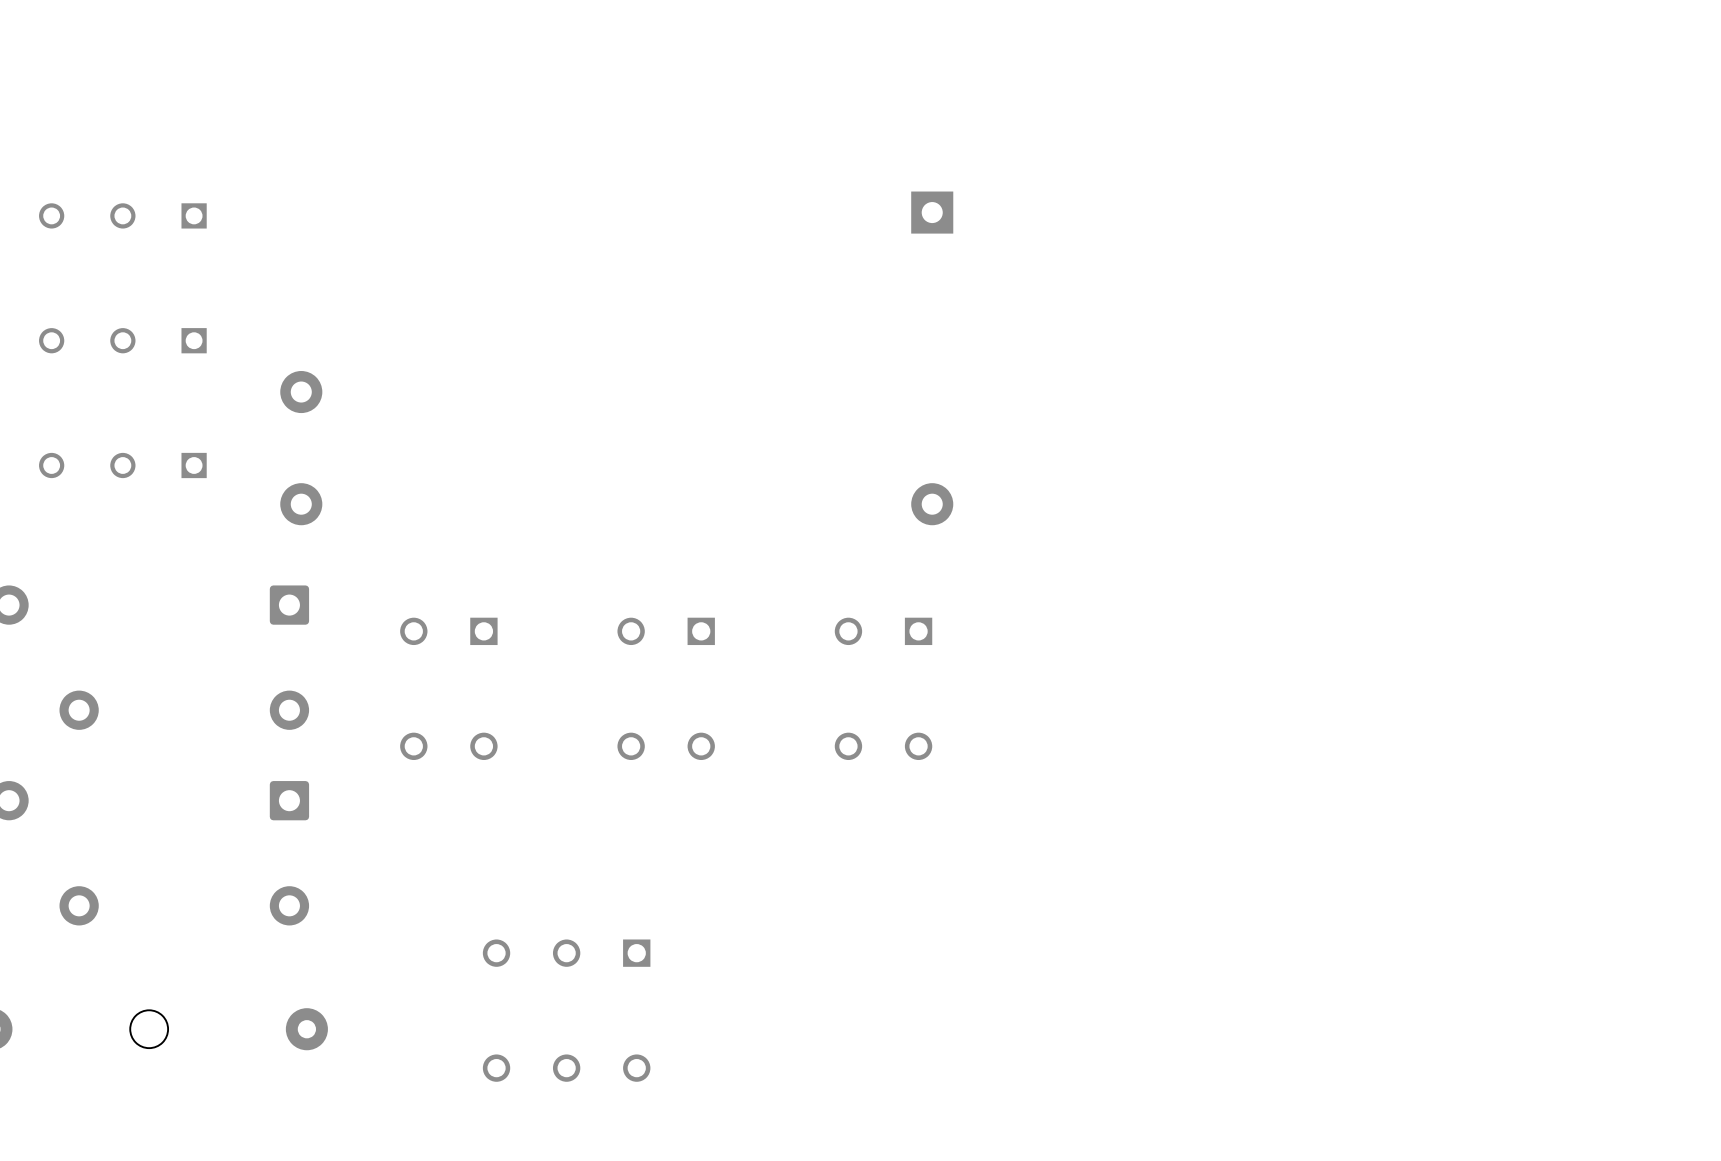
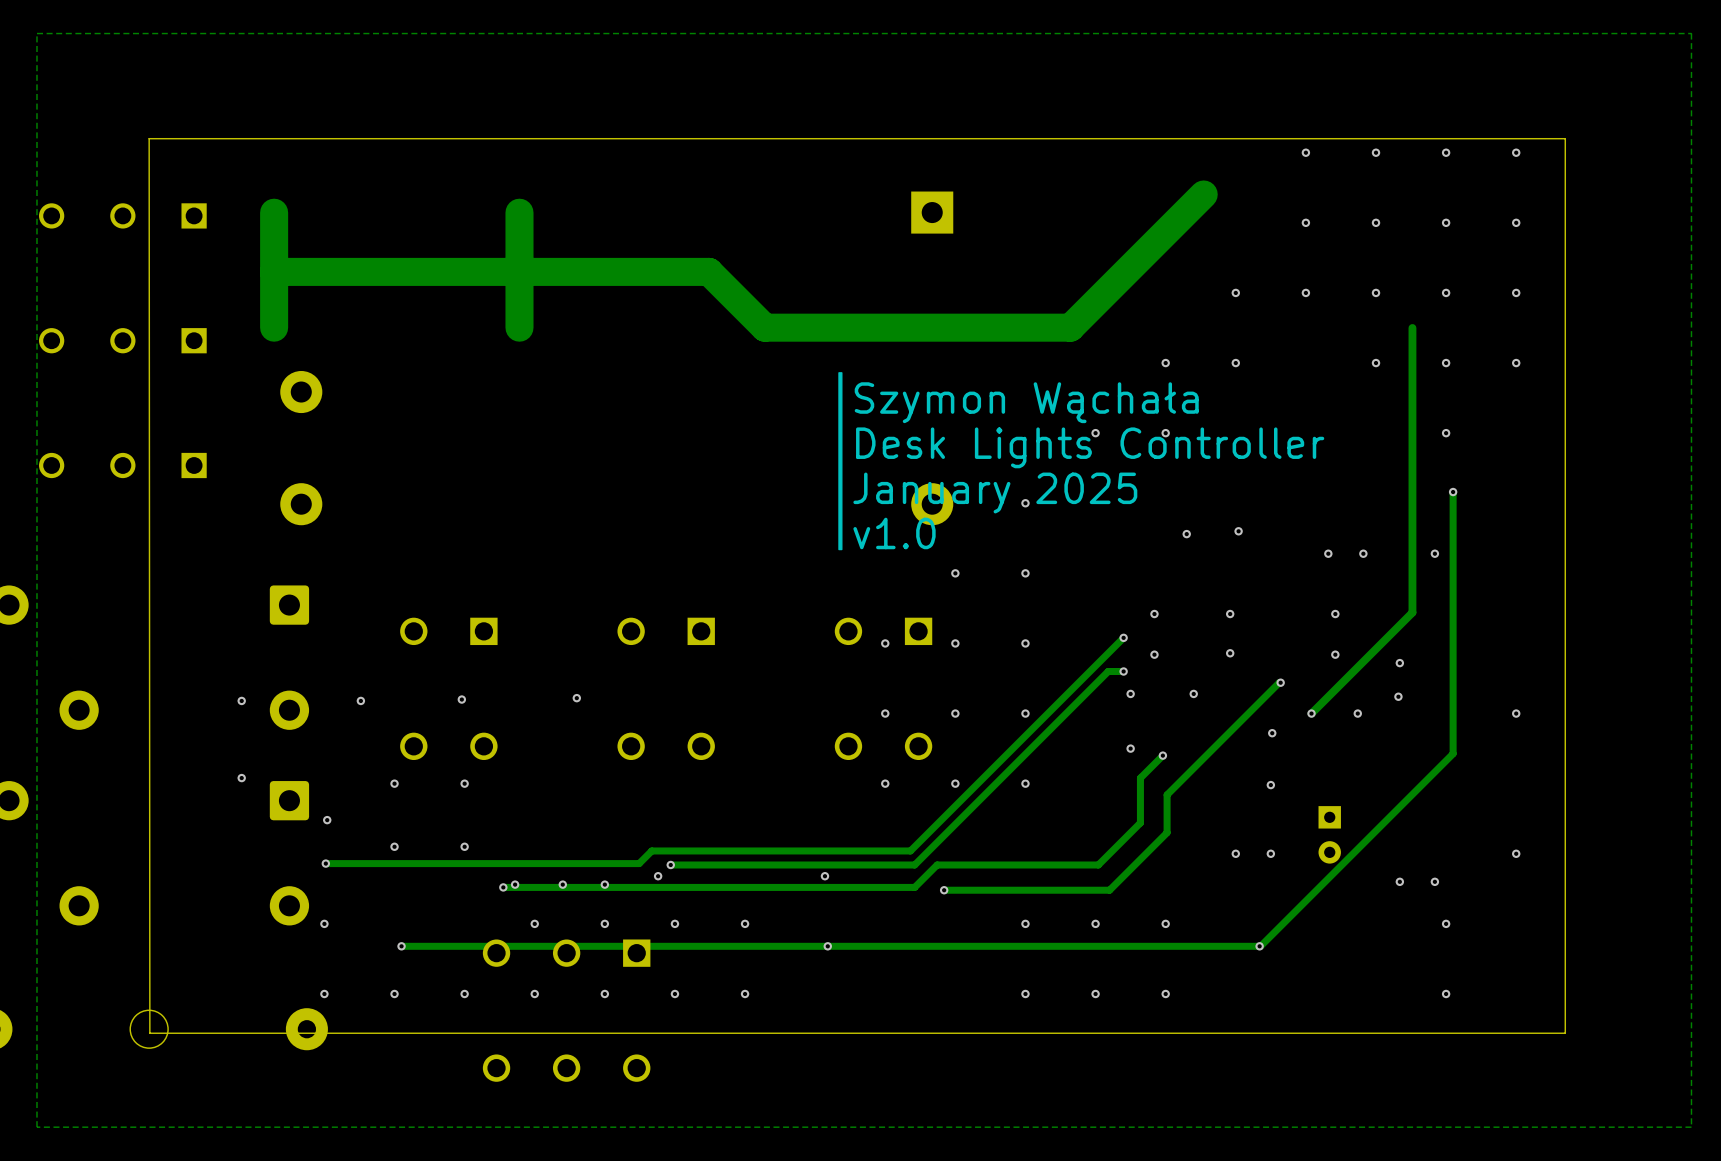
zone outline: none -> (1691, 33) (1691, 1127) (36, 1127) (36, 33) (1691, 33)
board edge: none -> (1565, 138) (1565, 1033) (149, 1033) (149, 138) (1565, 138)
via: none -> (1305, 152)
via: none -> (1376, 152)
via: none -> (1446, 152)
via: none -> (1516, 152)
track: none -> (1203, 194) (1070, 327) (764, 327) (709, 271) (274, 271)
track: none -> (274, 212) (274, 327)
track: none -> (519, 212) (519, 327)
via: none -> (1305, 222)
via: none -> (1376, 222)
via: none -> (1446, 222)
via: none -> (1516, 222)
via: none -> (1235, 292)
via: none -> (1305, 292)
via: none -> (1376, 292)
via: none -> (1446, 292)
via: none -> (1516, 292)
track: none -> (1412, 327) (1412, 612) (1311, 713)
via: none -> (1165, 363)
via: none -> (1235, 363)
via: none -> (1376, 363)
via: none -> (1446, 363)
via: none -> (1516, 363)
drawing: none -> [838, 372, 843, 551]
text: none -> Szymon Wąchała (1026, 402)
via: none -> (1095, 433)
via: none -> (1165, 433)
via: none -> (1446, 433)
text: none -> Desk Lights Controller (1090, 447)
text: none -> January 2025 (995, 492)
track: none -> (1453, 492) (1453, 753) (1260, 946) (401, 946)
via: none -> (1453, 492)
via: none -> (1025, 503)
via: none -> (1238, 531)
text: none -> v1.0 (894, 533)
via: none -> (1186, 534)
via: none -> (1328, 553)
via: none -> (1363, 553)
via: none -> (1434, 553)
via: none -> (955, 573)
via: none -> (1025, 573)
via: none -> (1154, 614)
via: none -> (1230, 614)
via: none -> (1335, 614)
track: none -> (1123, 637) (910, 850) (651, 850) (639, 863) (325, 863)
via: none -> (1123, 637)
via: none -> (885, 643)
via: none -> (955, 643)
via: none -> (1025, 643)
via: none -> (1230, 653)
via: none -> (1154, 654)
via: none -> (1335, 654)
via: none -> (1399, 663)
track: none -> (1123, 671) (1108, 671) (914, 864) (670, 864)
via: none -> (1123, 671)
track: none -> (1280, 682) (1167, 794) (1167, 832) (1109, 890) (944, 890)
via: none -> (1280, 682)
via: none -> (1130, 693)
via: none -> (1193, 693)
via: none -> (1398, 696)
via: none -> (576, 698)
via: none -> (461, 699)
via: none -> (241, 700)
via: none -> (360, 700)
via: none -> (885, 713)
via: none -> (955, 713)
via: none -> (1025, 713)
via: none -> (1311, 713)
via: none -> (1357, 713)
via: none -> (1516, 713)
via: none -> (1272, 733)
via: none -> (1130, 748)
track: none -> (1162, 755) (1140, 778) (1140, 822) (1098, 864) (937, 864) (914, 887) (503, 887)
via: none -> (1162, 755)
via: none -> (241, 778)
via: none -> (394, 783)
via: none -> (464, 783)
via: none -> (885, 783)
via: none -> (955, 783)
via: none -> (1025, 783)
via: none -> (1270, 785)
via: none -> (327, 820)
part: none -> (1329, 834)
via: none -> (394, 846)
via: none -> (464, 846)
via: none -> (1235, 853)
via: none -> (1270, 853)
via: none -> (1516, 853)
via: none -> (325, 863)
via: none -> (670, 864)
via: none -> (658, 876)
via: none -> (824, 876)
via: none -> (1399, 881)
via: none -> (1434, 881)
via: none -> (515, 884)
via: none -> (562, 884)
via: none -> (604, 884)
via: none -> (503, 887)
via: none -> (944, 890)
via: none -> (324, 923)
via: none -> (534, 923)
via: none -> (604, 923)
via: none -> (674, 923)
via: none -> (745, 923)
via: none -> (1025, 923)
via: none -> (1095, 923)
via: none -> (1165, 923)
via: none -> (1446, 923)
via: none -> (401, 946)
via: none -> (827, 946)
via: none -> (1259, 946)
via: none -> (324, 993)
via: none -> (394, 993)
via: none -> (464, 993)
via: none -> (534, 993)
via: none -> (604, 993)
via: none -> (674, 993)
via: none -> (745, 993)
via: none -> (1025, 993)
via: none -> (1095, 993)
via: none -> (1165, 993)
via: none -> (1446, 993)

